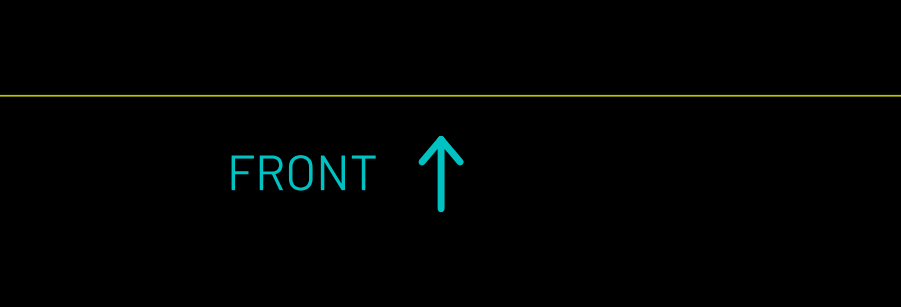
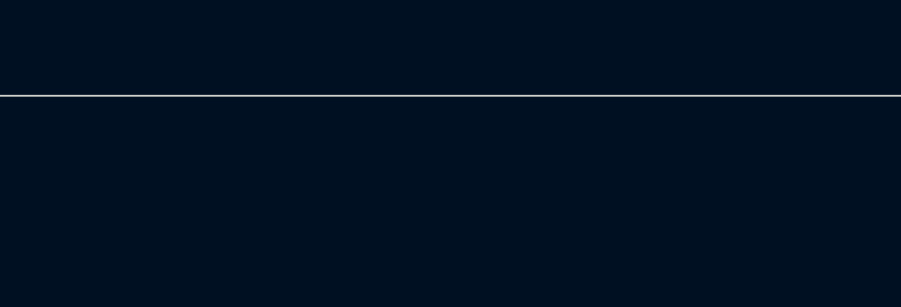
line: (441, 139) (422, 162) -> none
line: (441, 139) (460, 162) -> none
line: (441, 139) (441, 208) -> none
text: FRONT (303, 172) -> none

